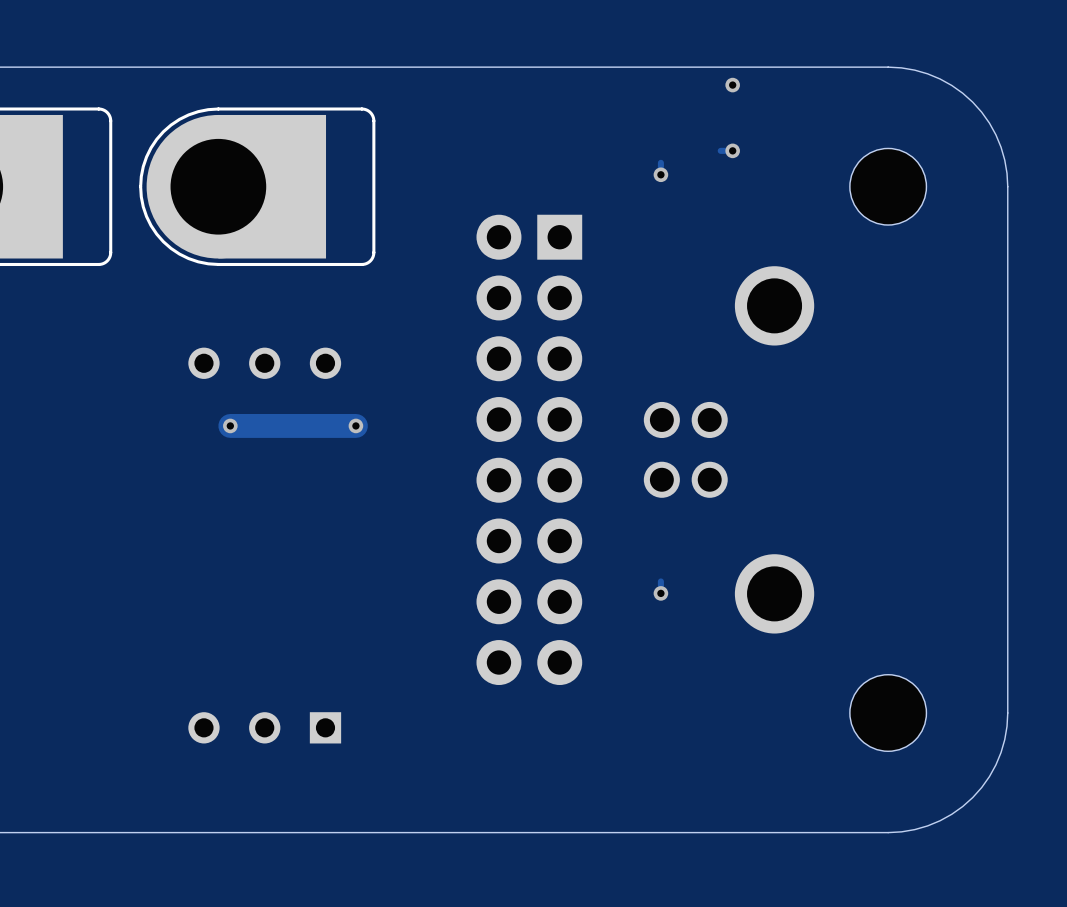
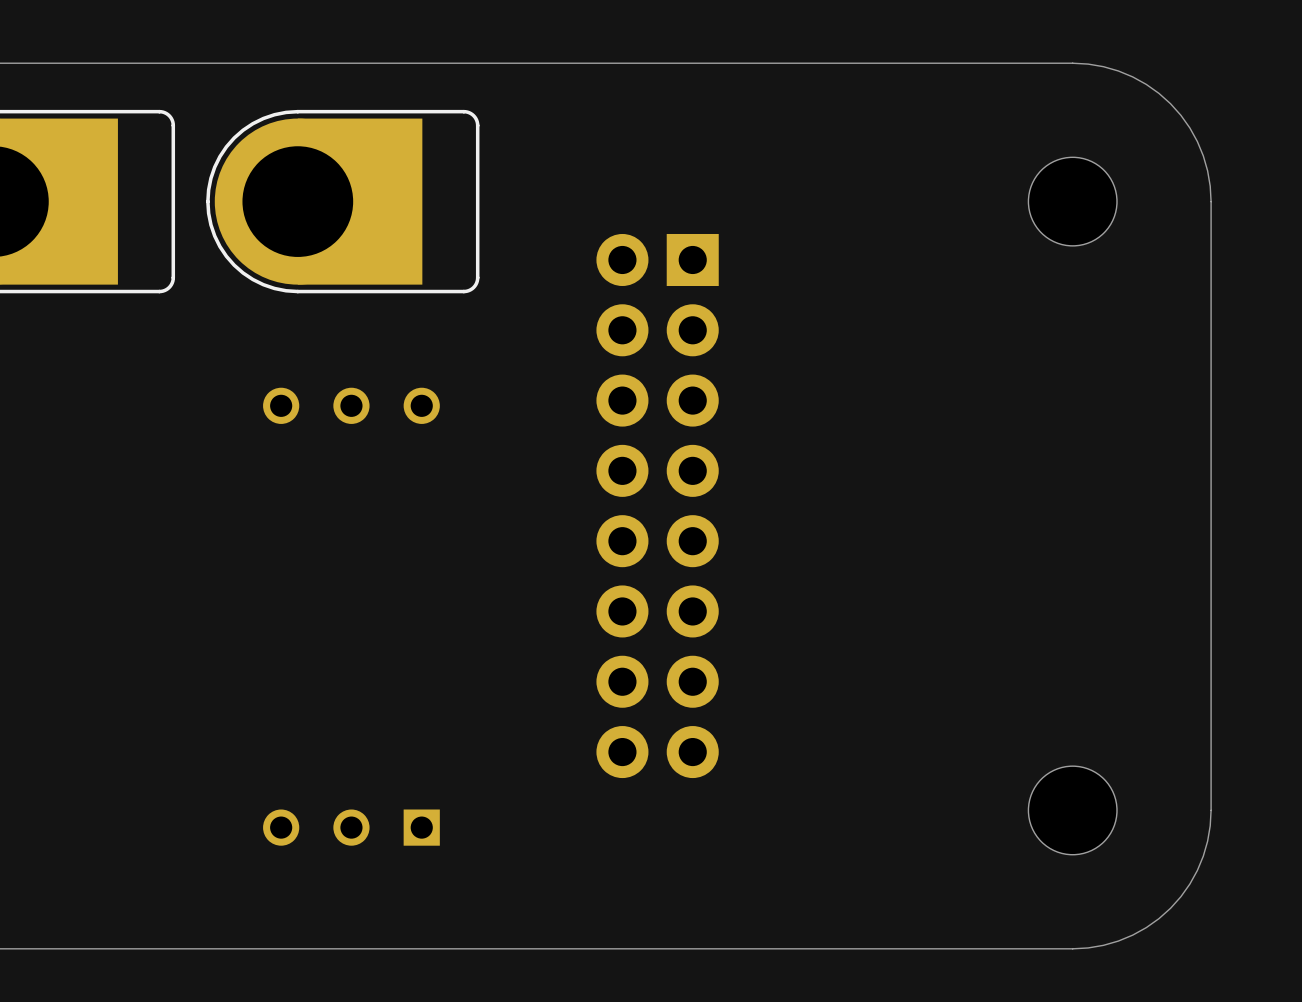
via: (732, 85) -> none
track: (732, 150) (720, 150) -> none
via: (732, 150) -> none
track: (660, 162) (660, 174) -> none
via: (660, 174) -> none
via: (230, 425) -> none
track: (355, 425) (230, 425) -> none
via: (355, 425) -> none
part: (729, 449) -> none
track: (660, 581) (660, 593) -> none
via: (660, 593) -> none

